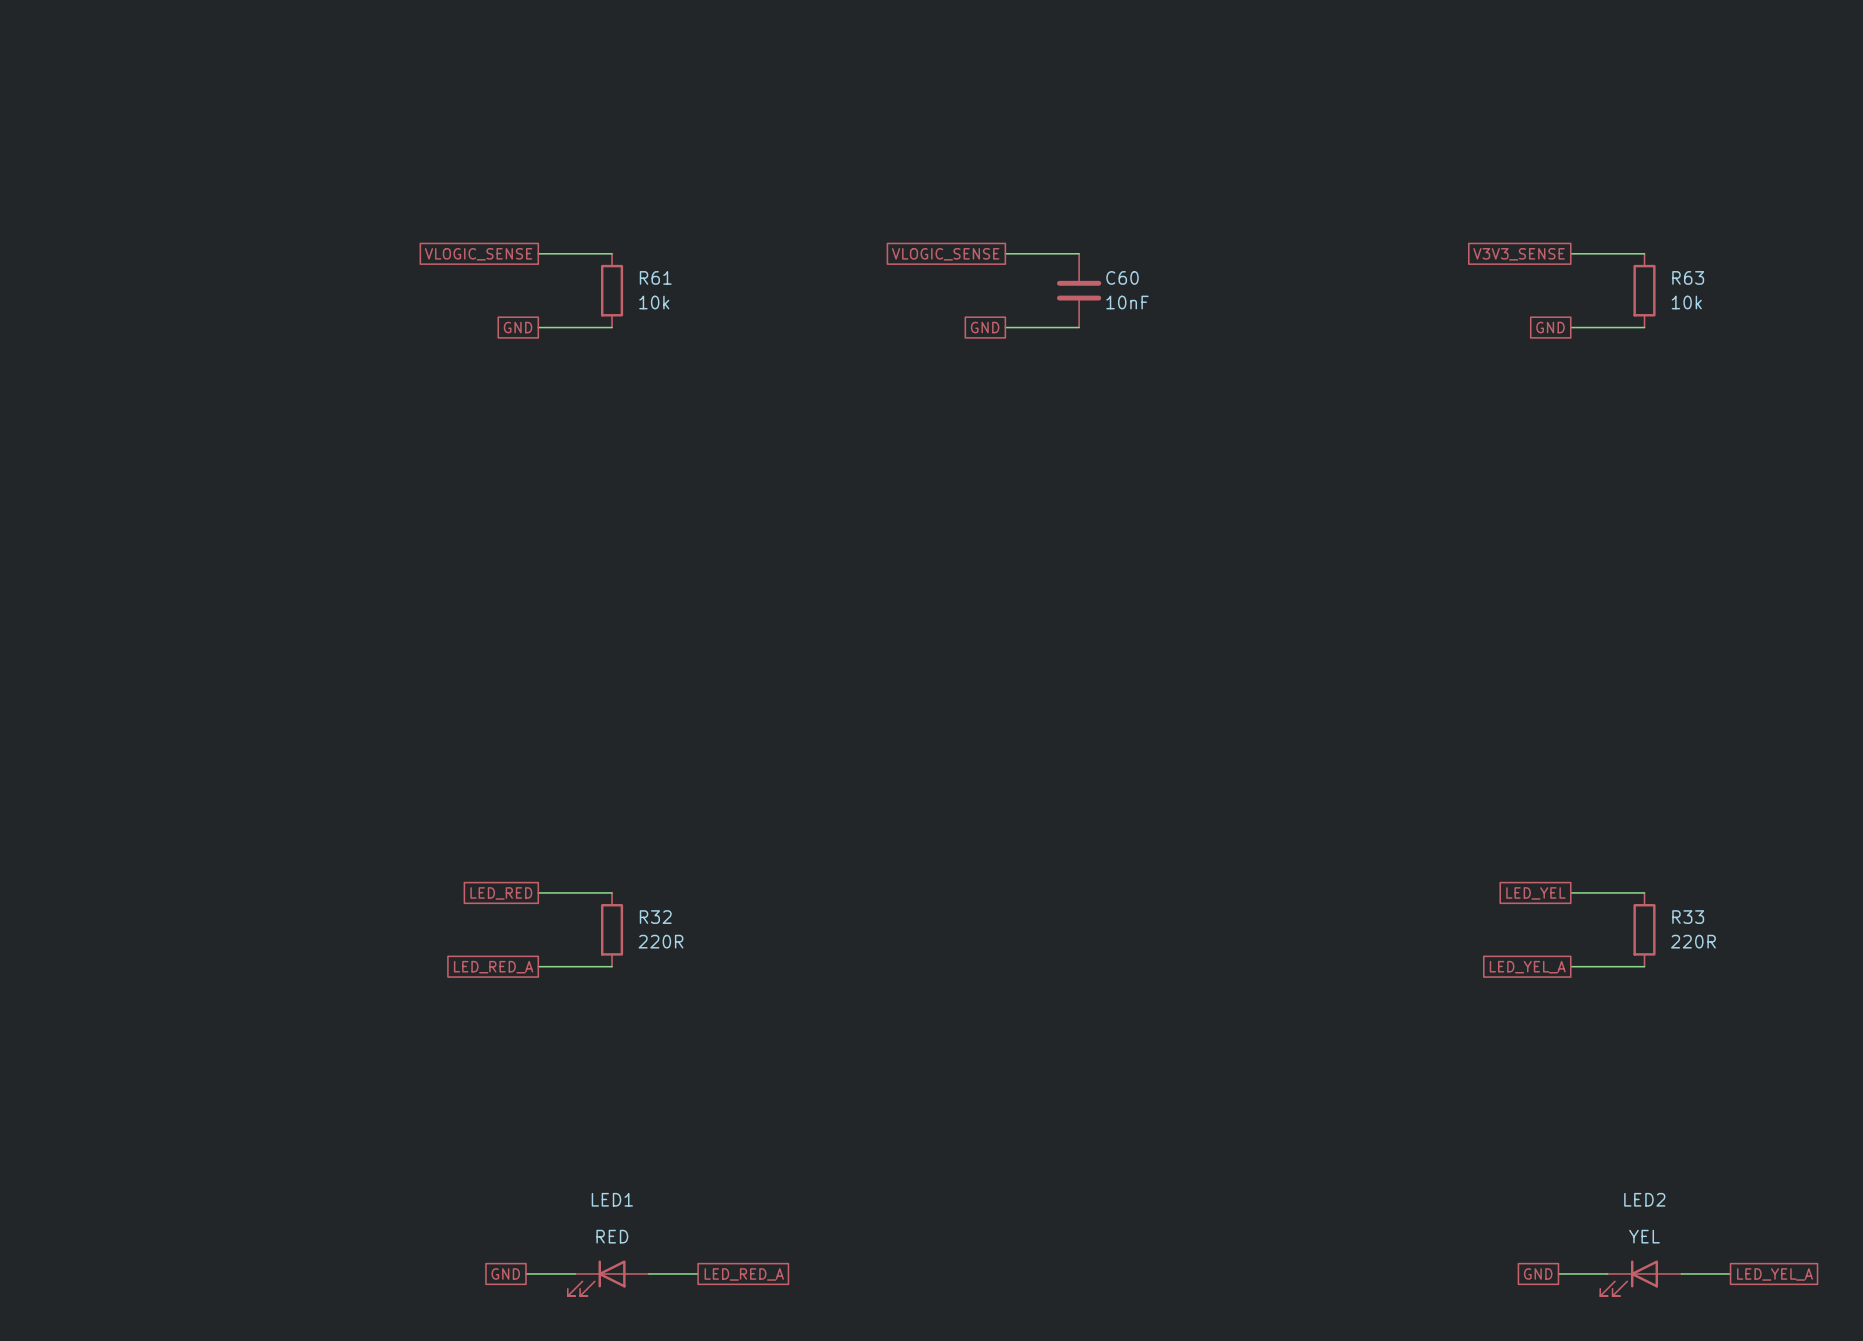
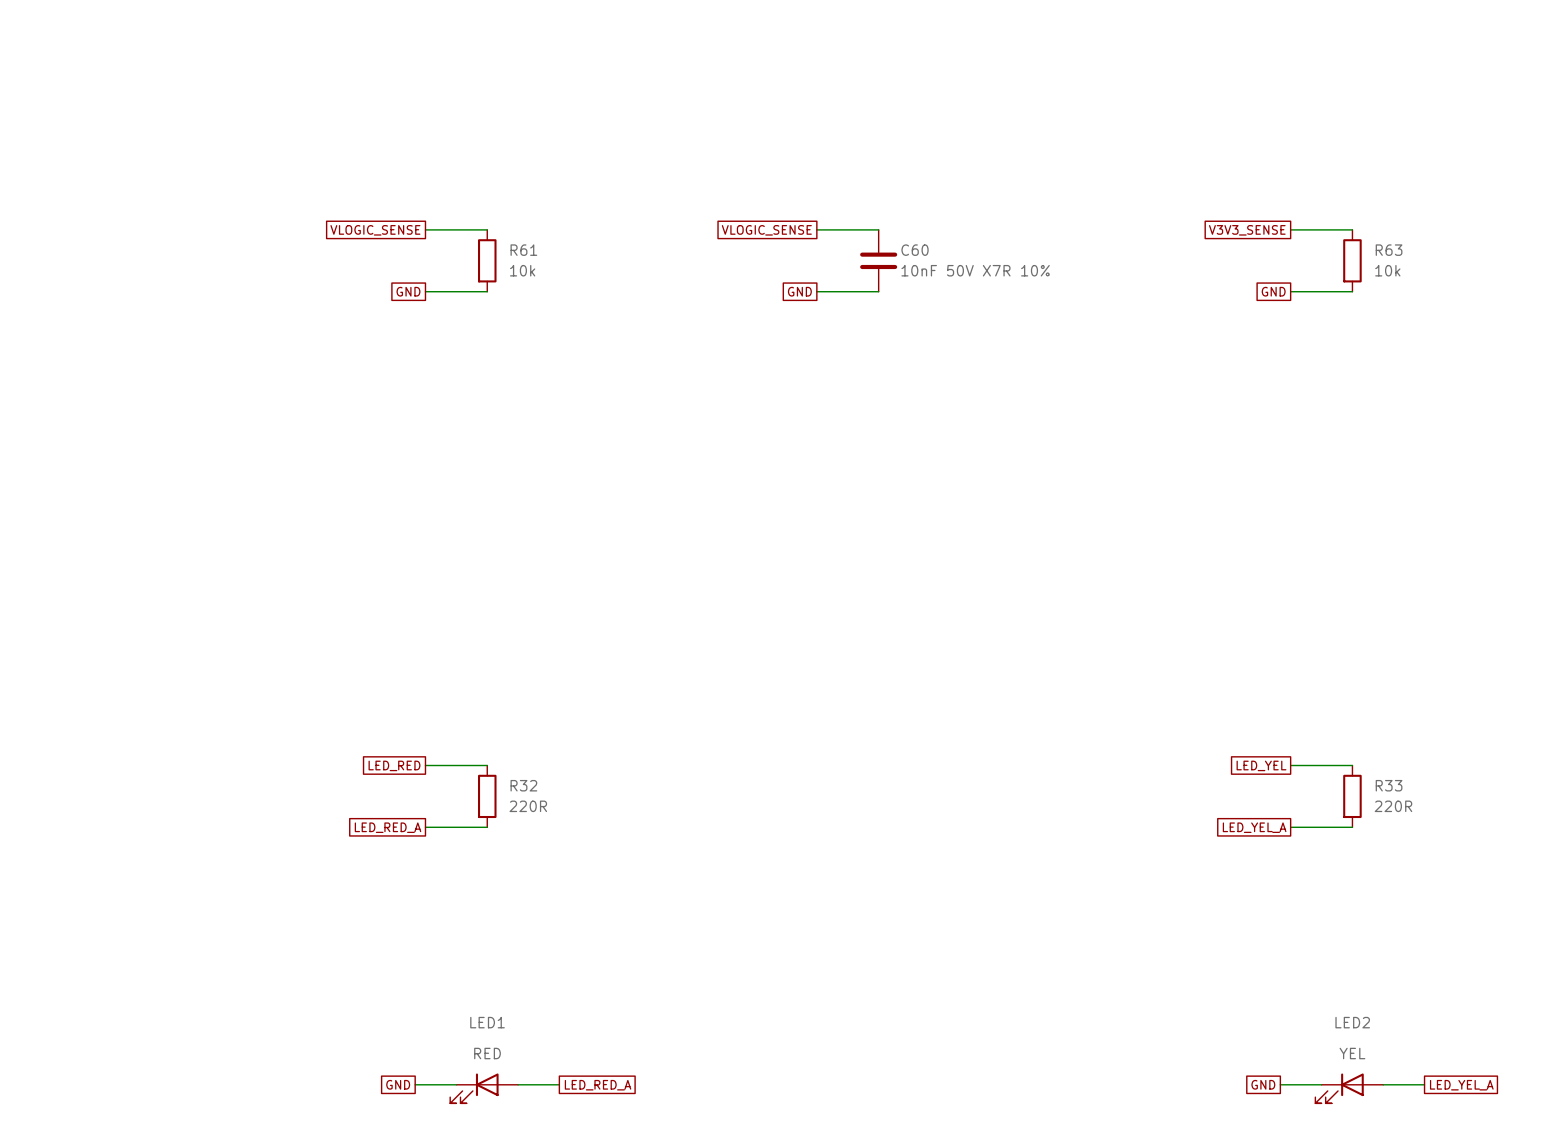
C60 value: 10nF (1127, 302) -> 10nF 50V X7R 10% (975, 270)

